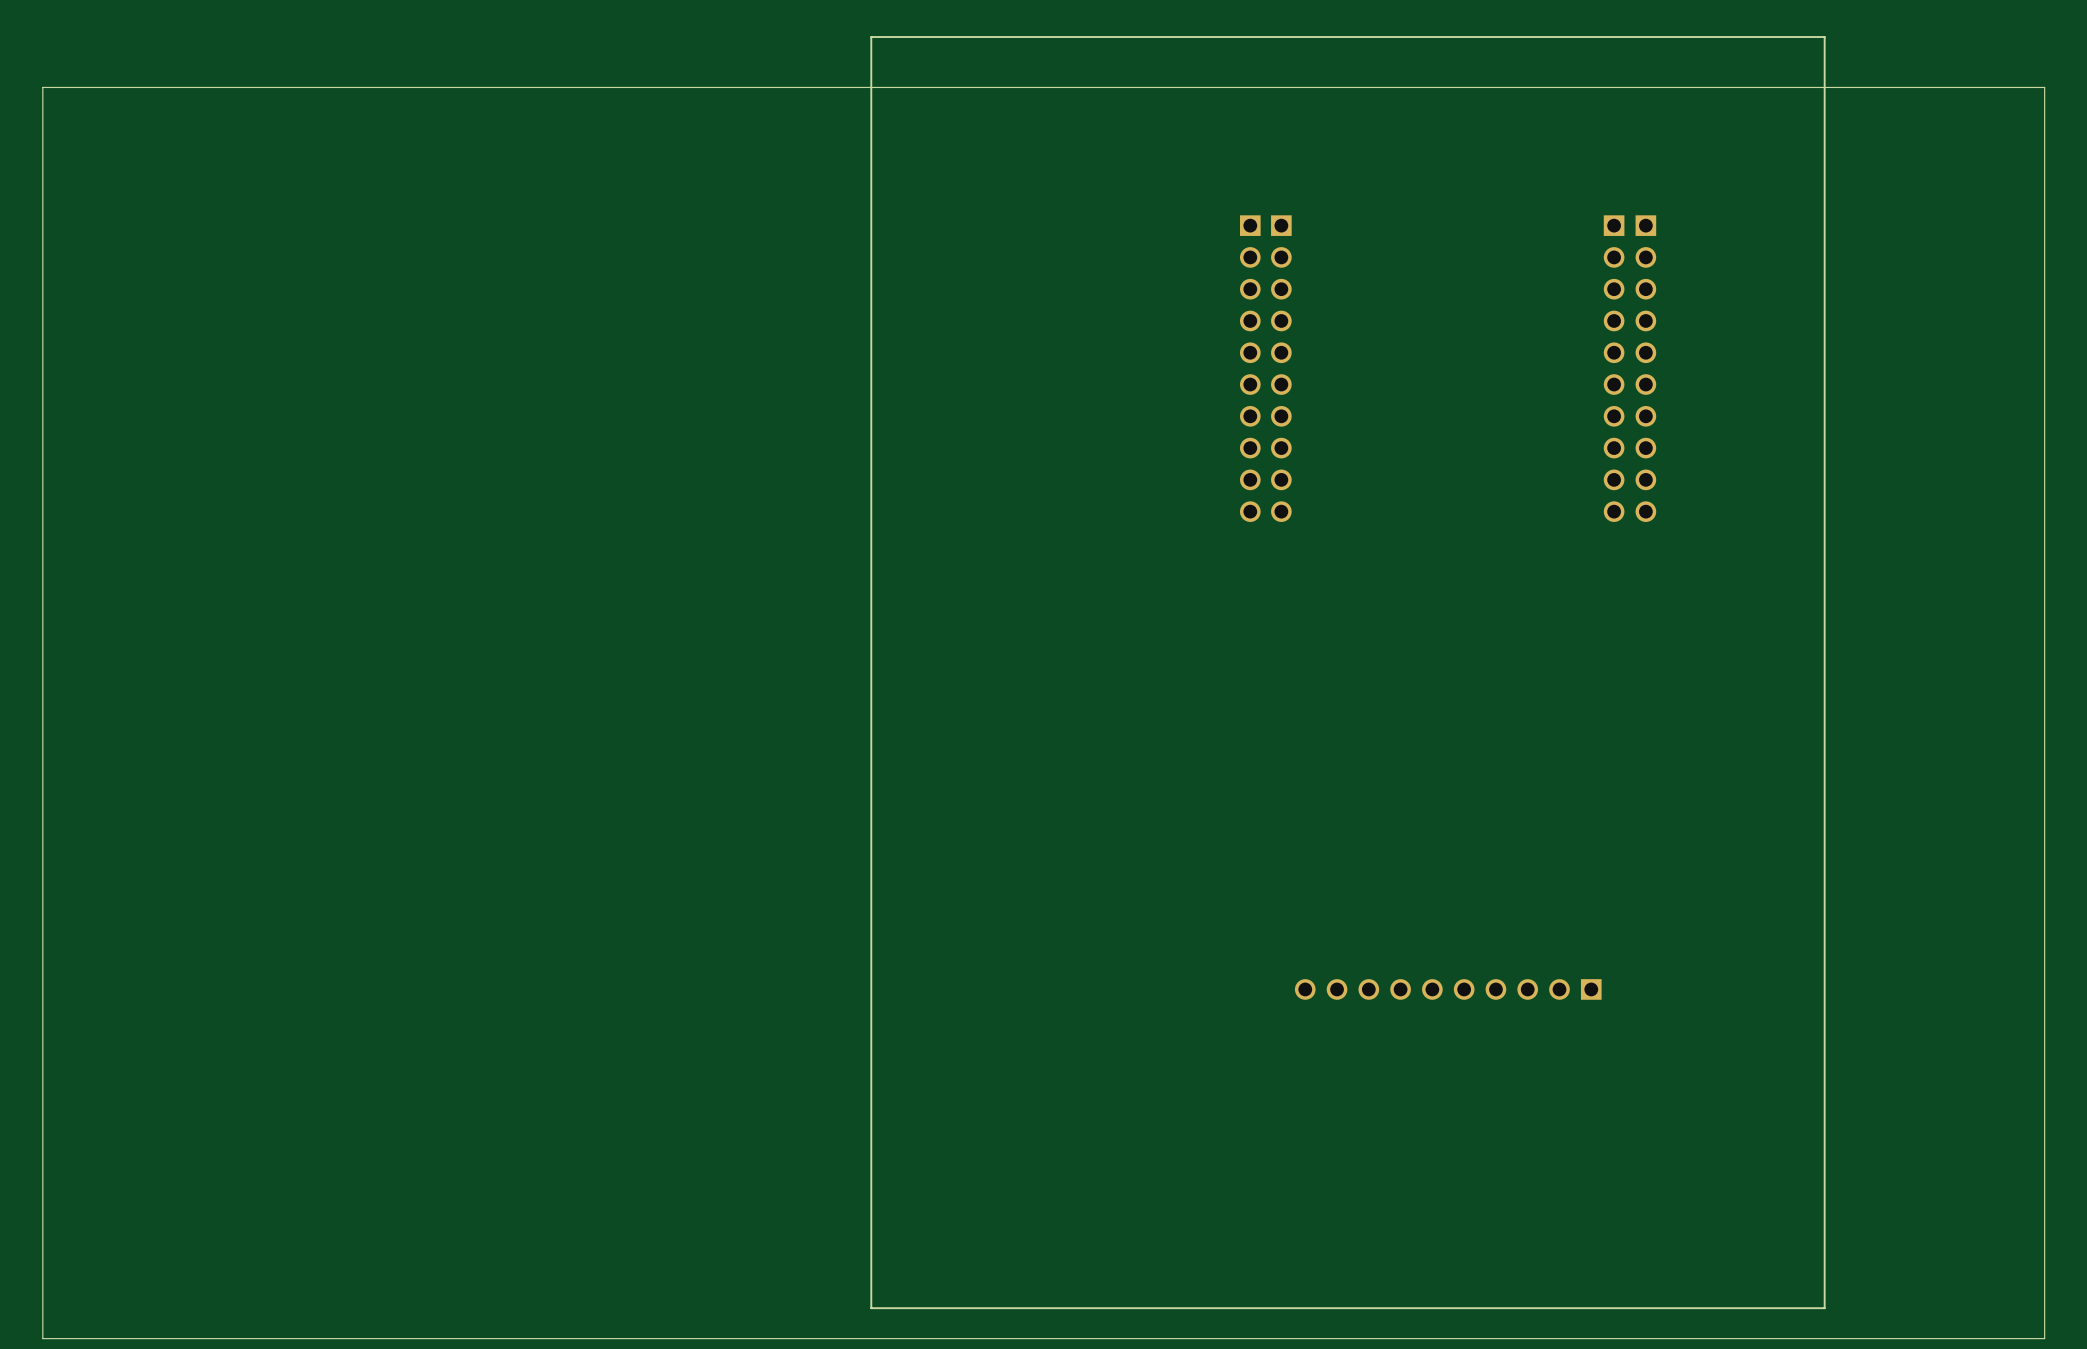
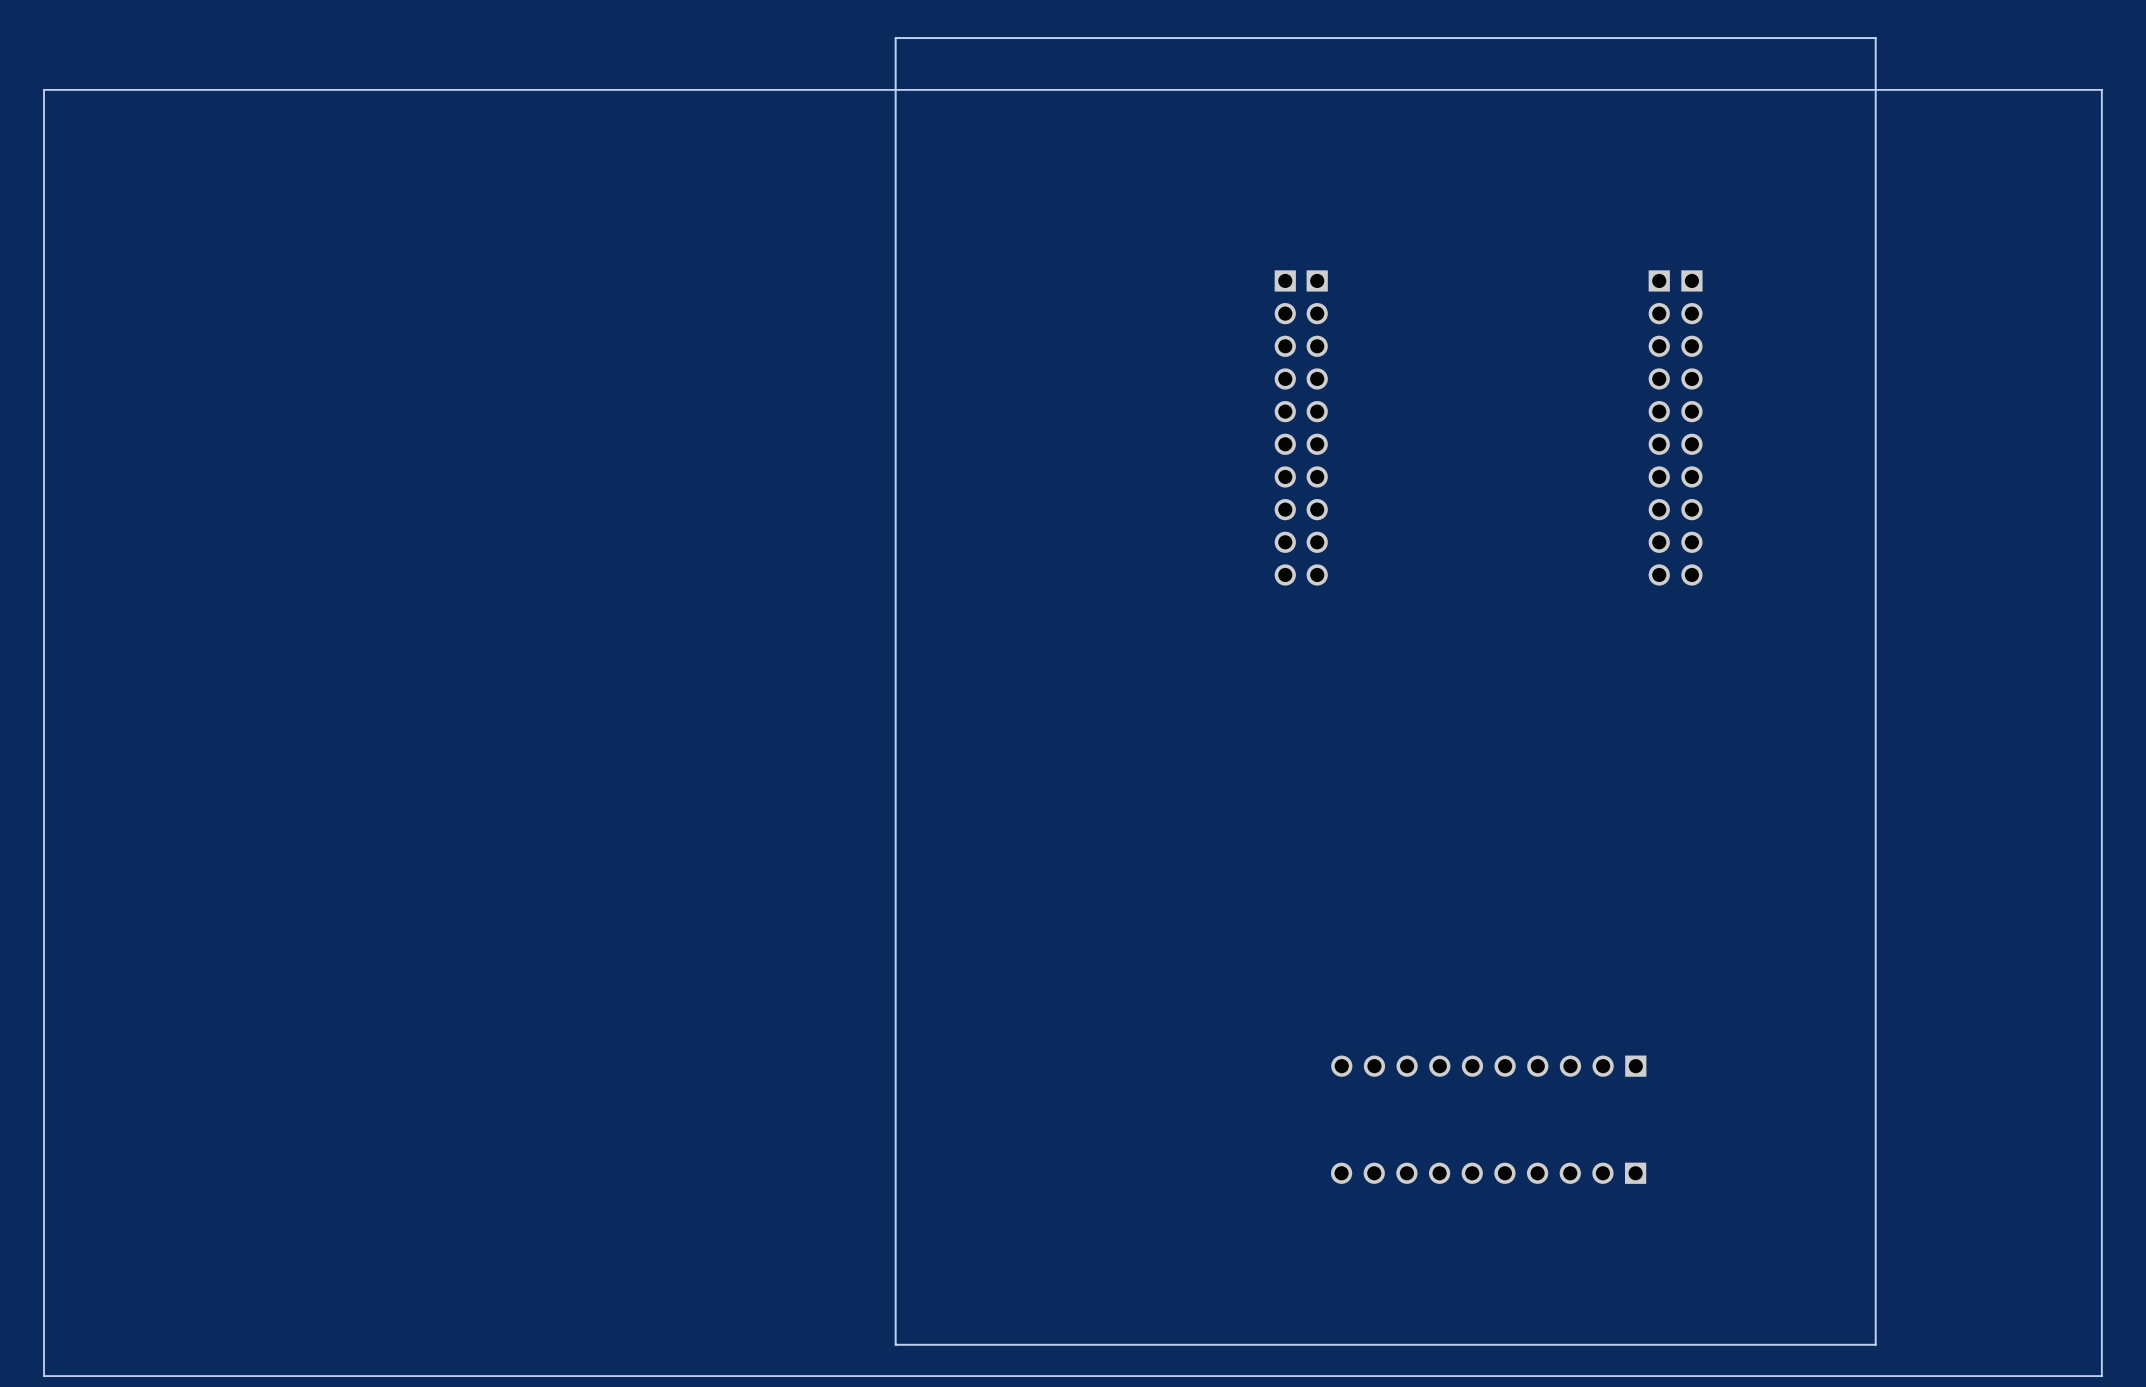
part: (1250, 368) -> none
part: (1281, 368) -> none
part: (1614, 368) -> none
part: (1645, 368) -> none
part: none -> (1285, 427)
part: none -> (1317, 427)
part: none -> (1659, 427)
part: none -> (1691, 427)
part position: (1448, 989) -> (1488, 1066)
part: none -> (1488, 1173)

